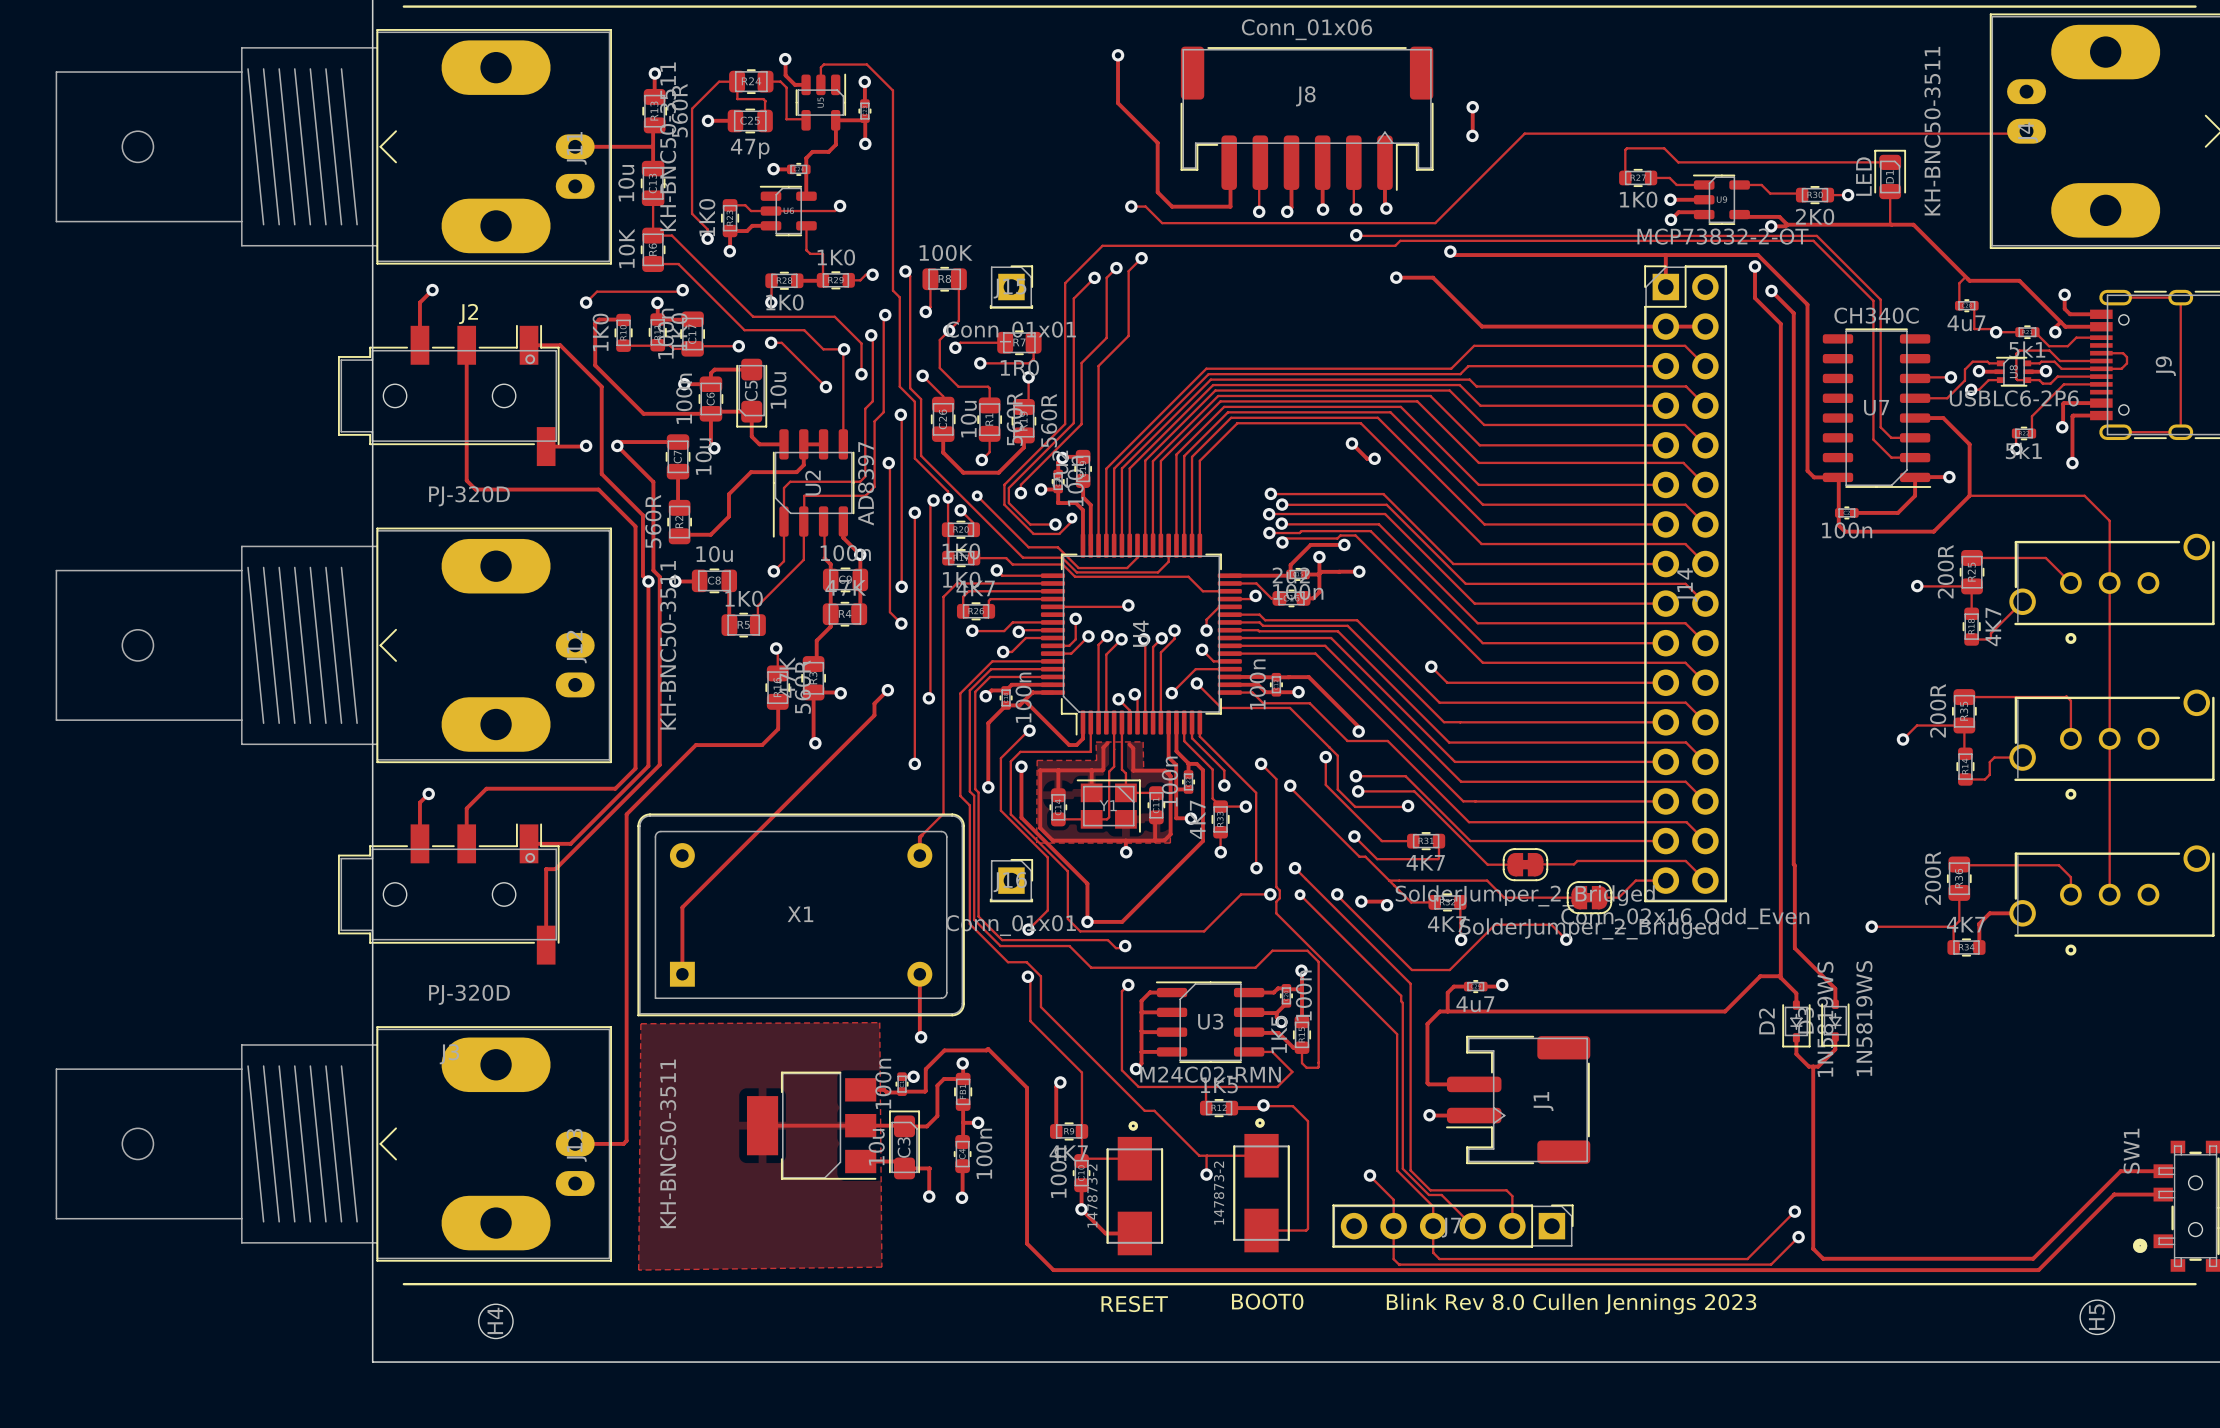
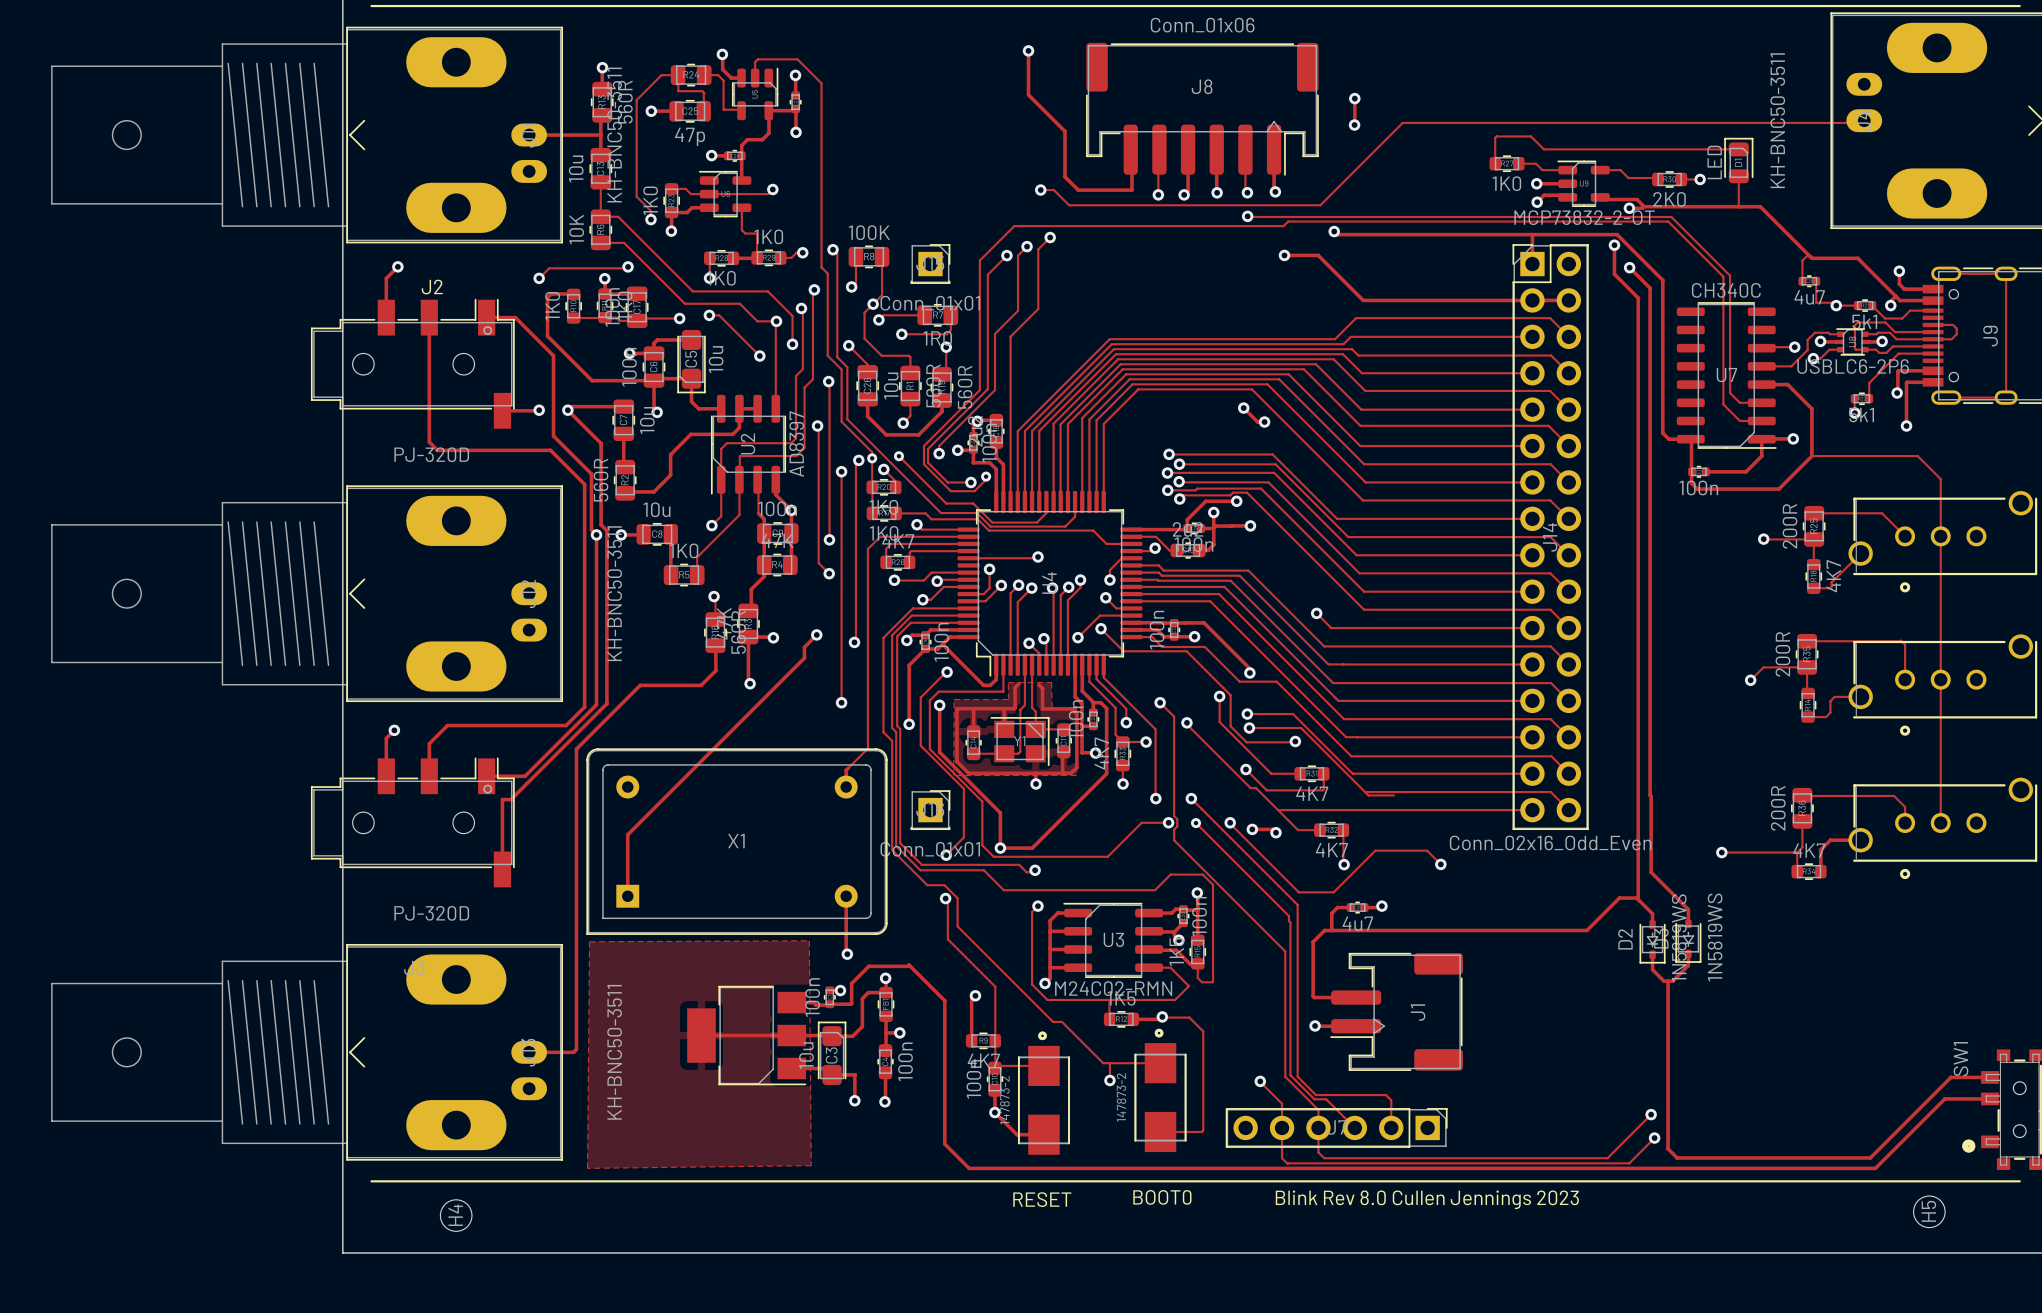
track: (1577, 860) (1574, 864) (1535, 864) -> (1451, 792) (1365, 792)
part: SolderJumper_2_Bridged (1525, 864) -> none
track: (1487, 880) (1504, 897) (1579, 897) -> (1368, 810) (1504, 810)
track: (1635, 880) (1618, 897) (1599, 897) -> none
part: SolderJumper_2_Bridged (1589, 897) -> none

